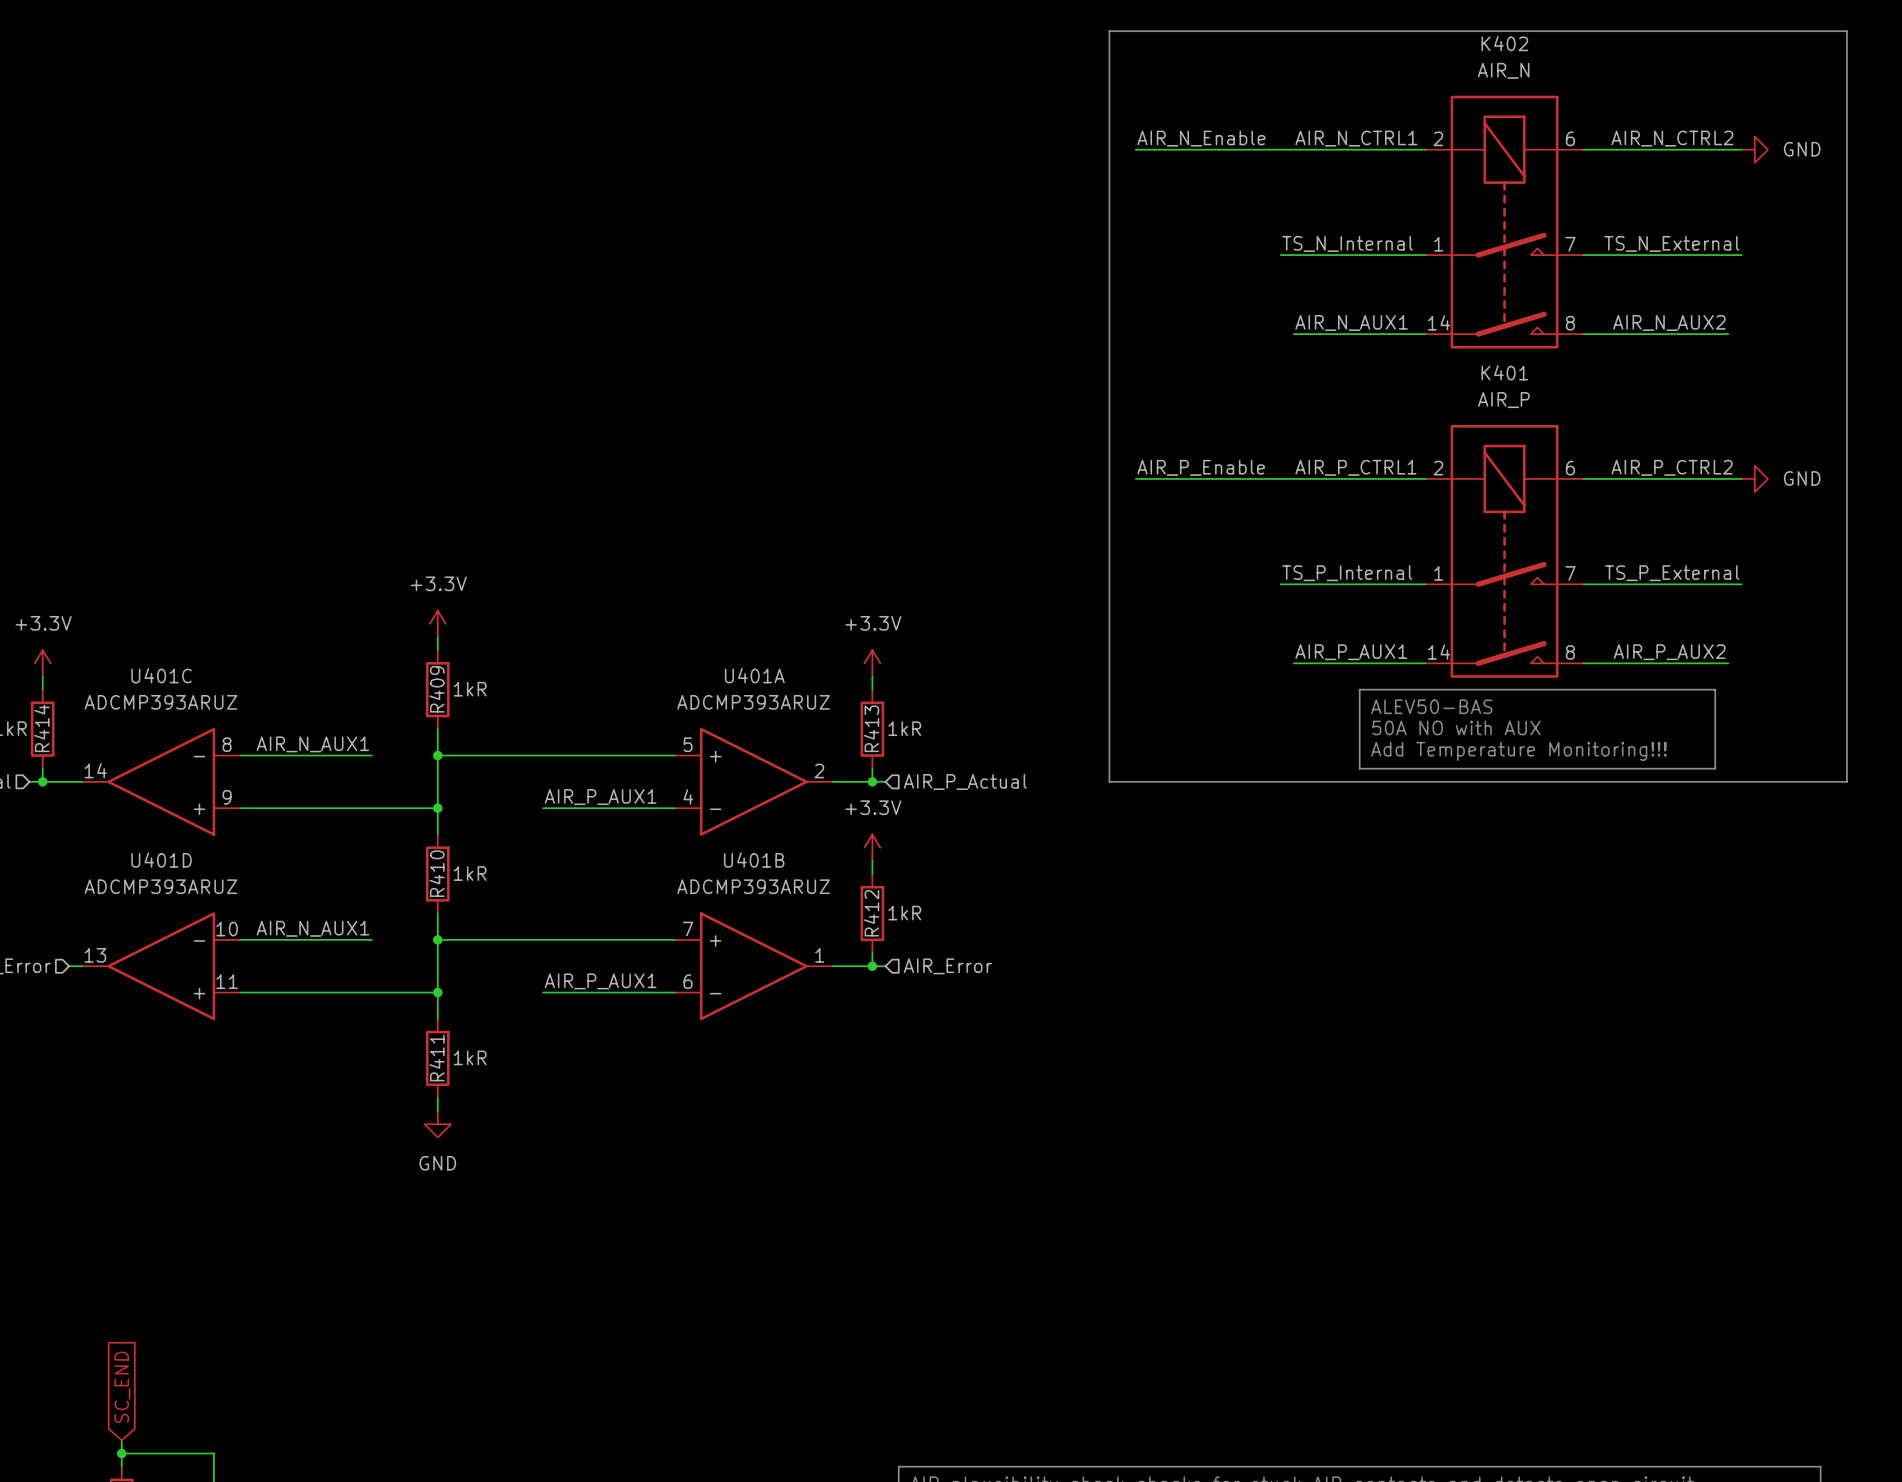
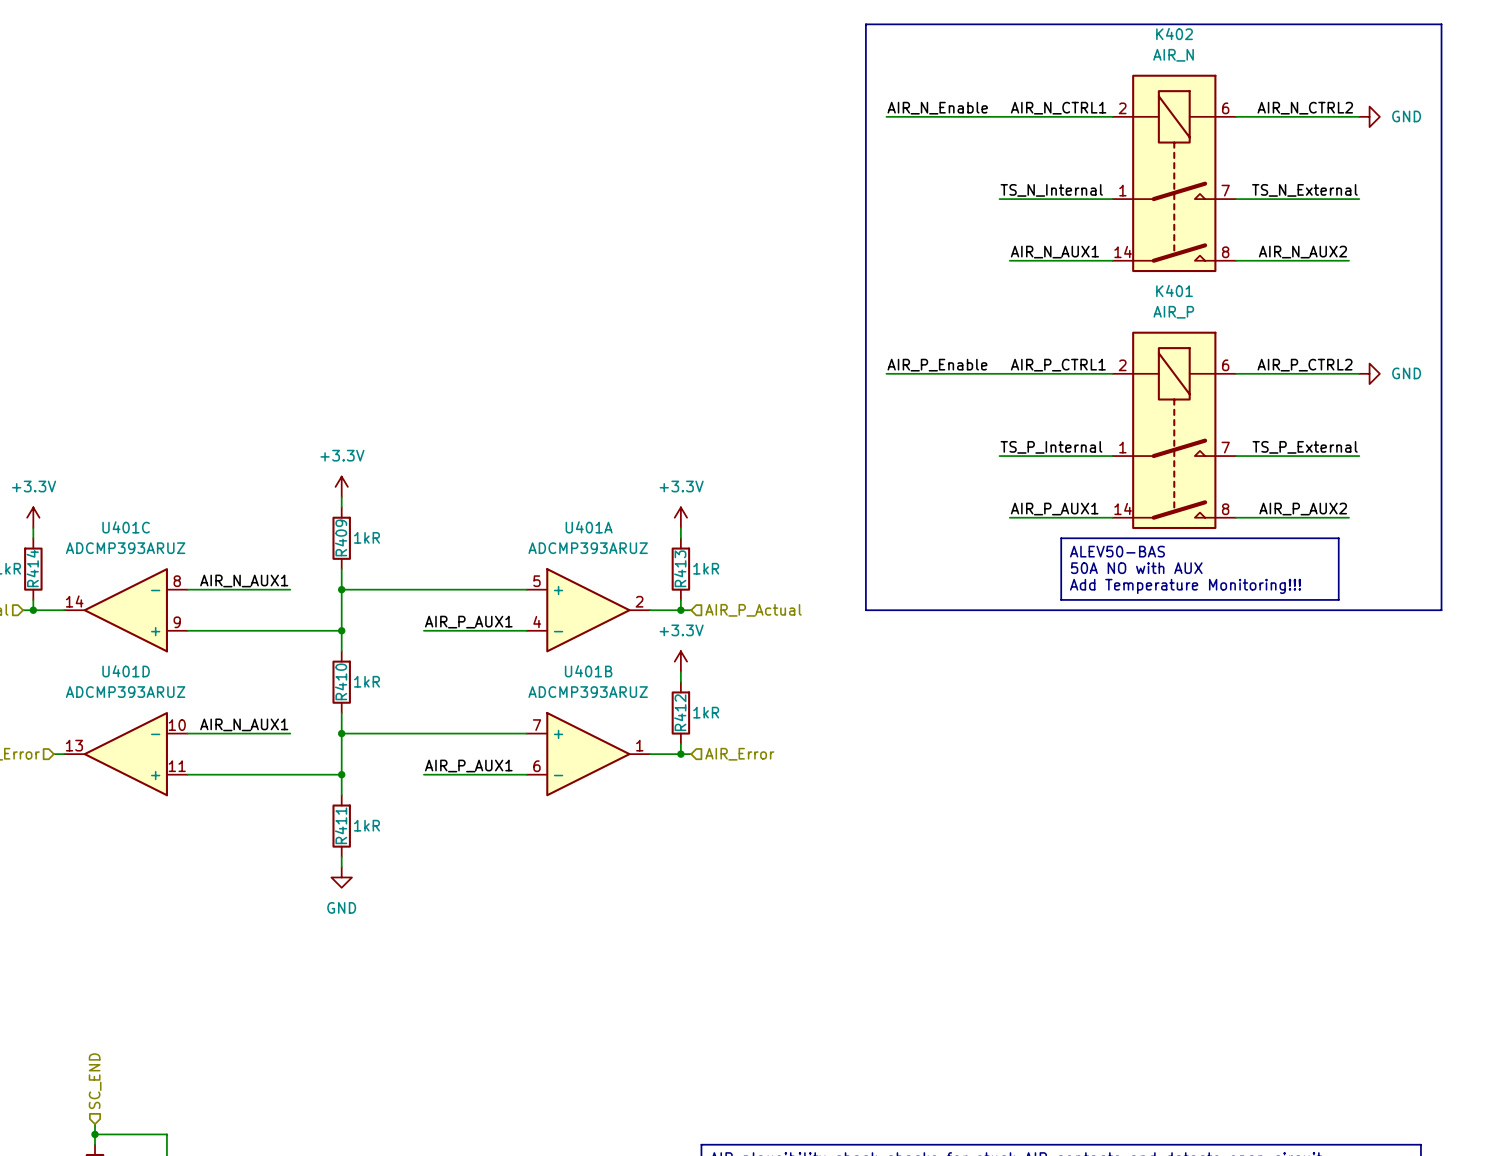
hierarchical label: none -> SC_END (95, 1081)
global label: SC_END (122, 1387) -> none

